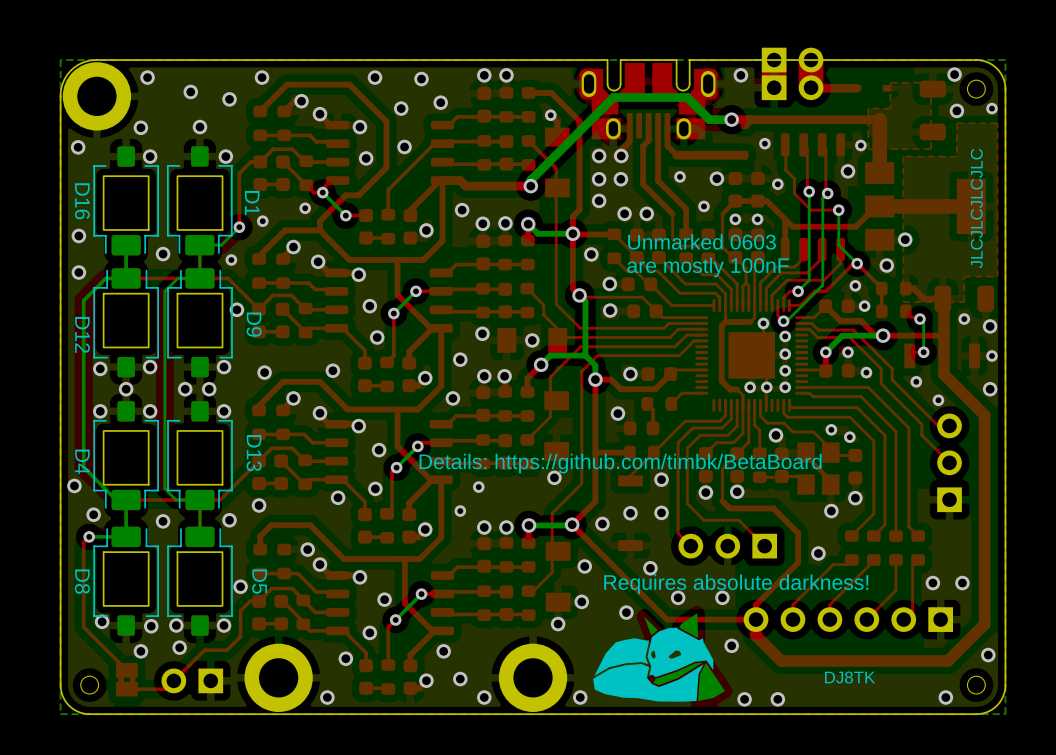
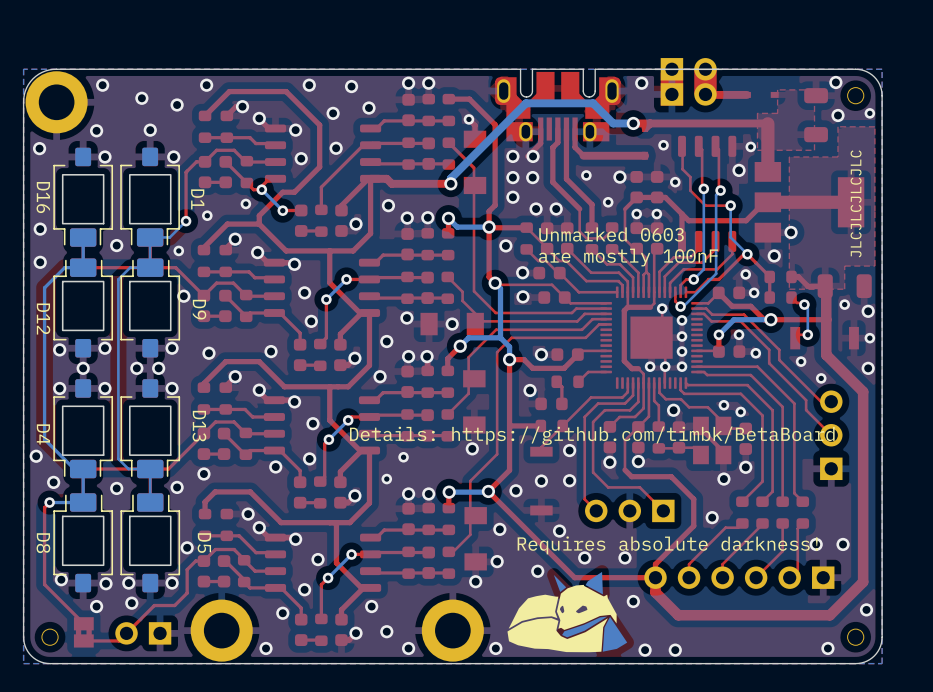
text: DJ8TK (850, 677) -> none

